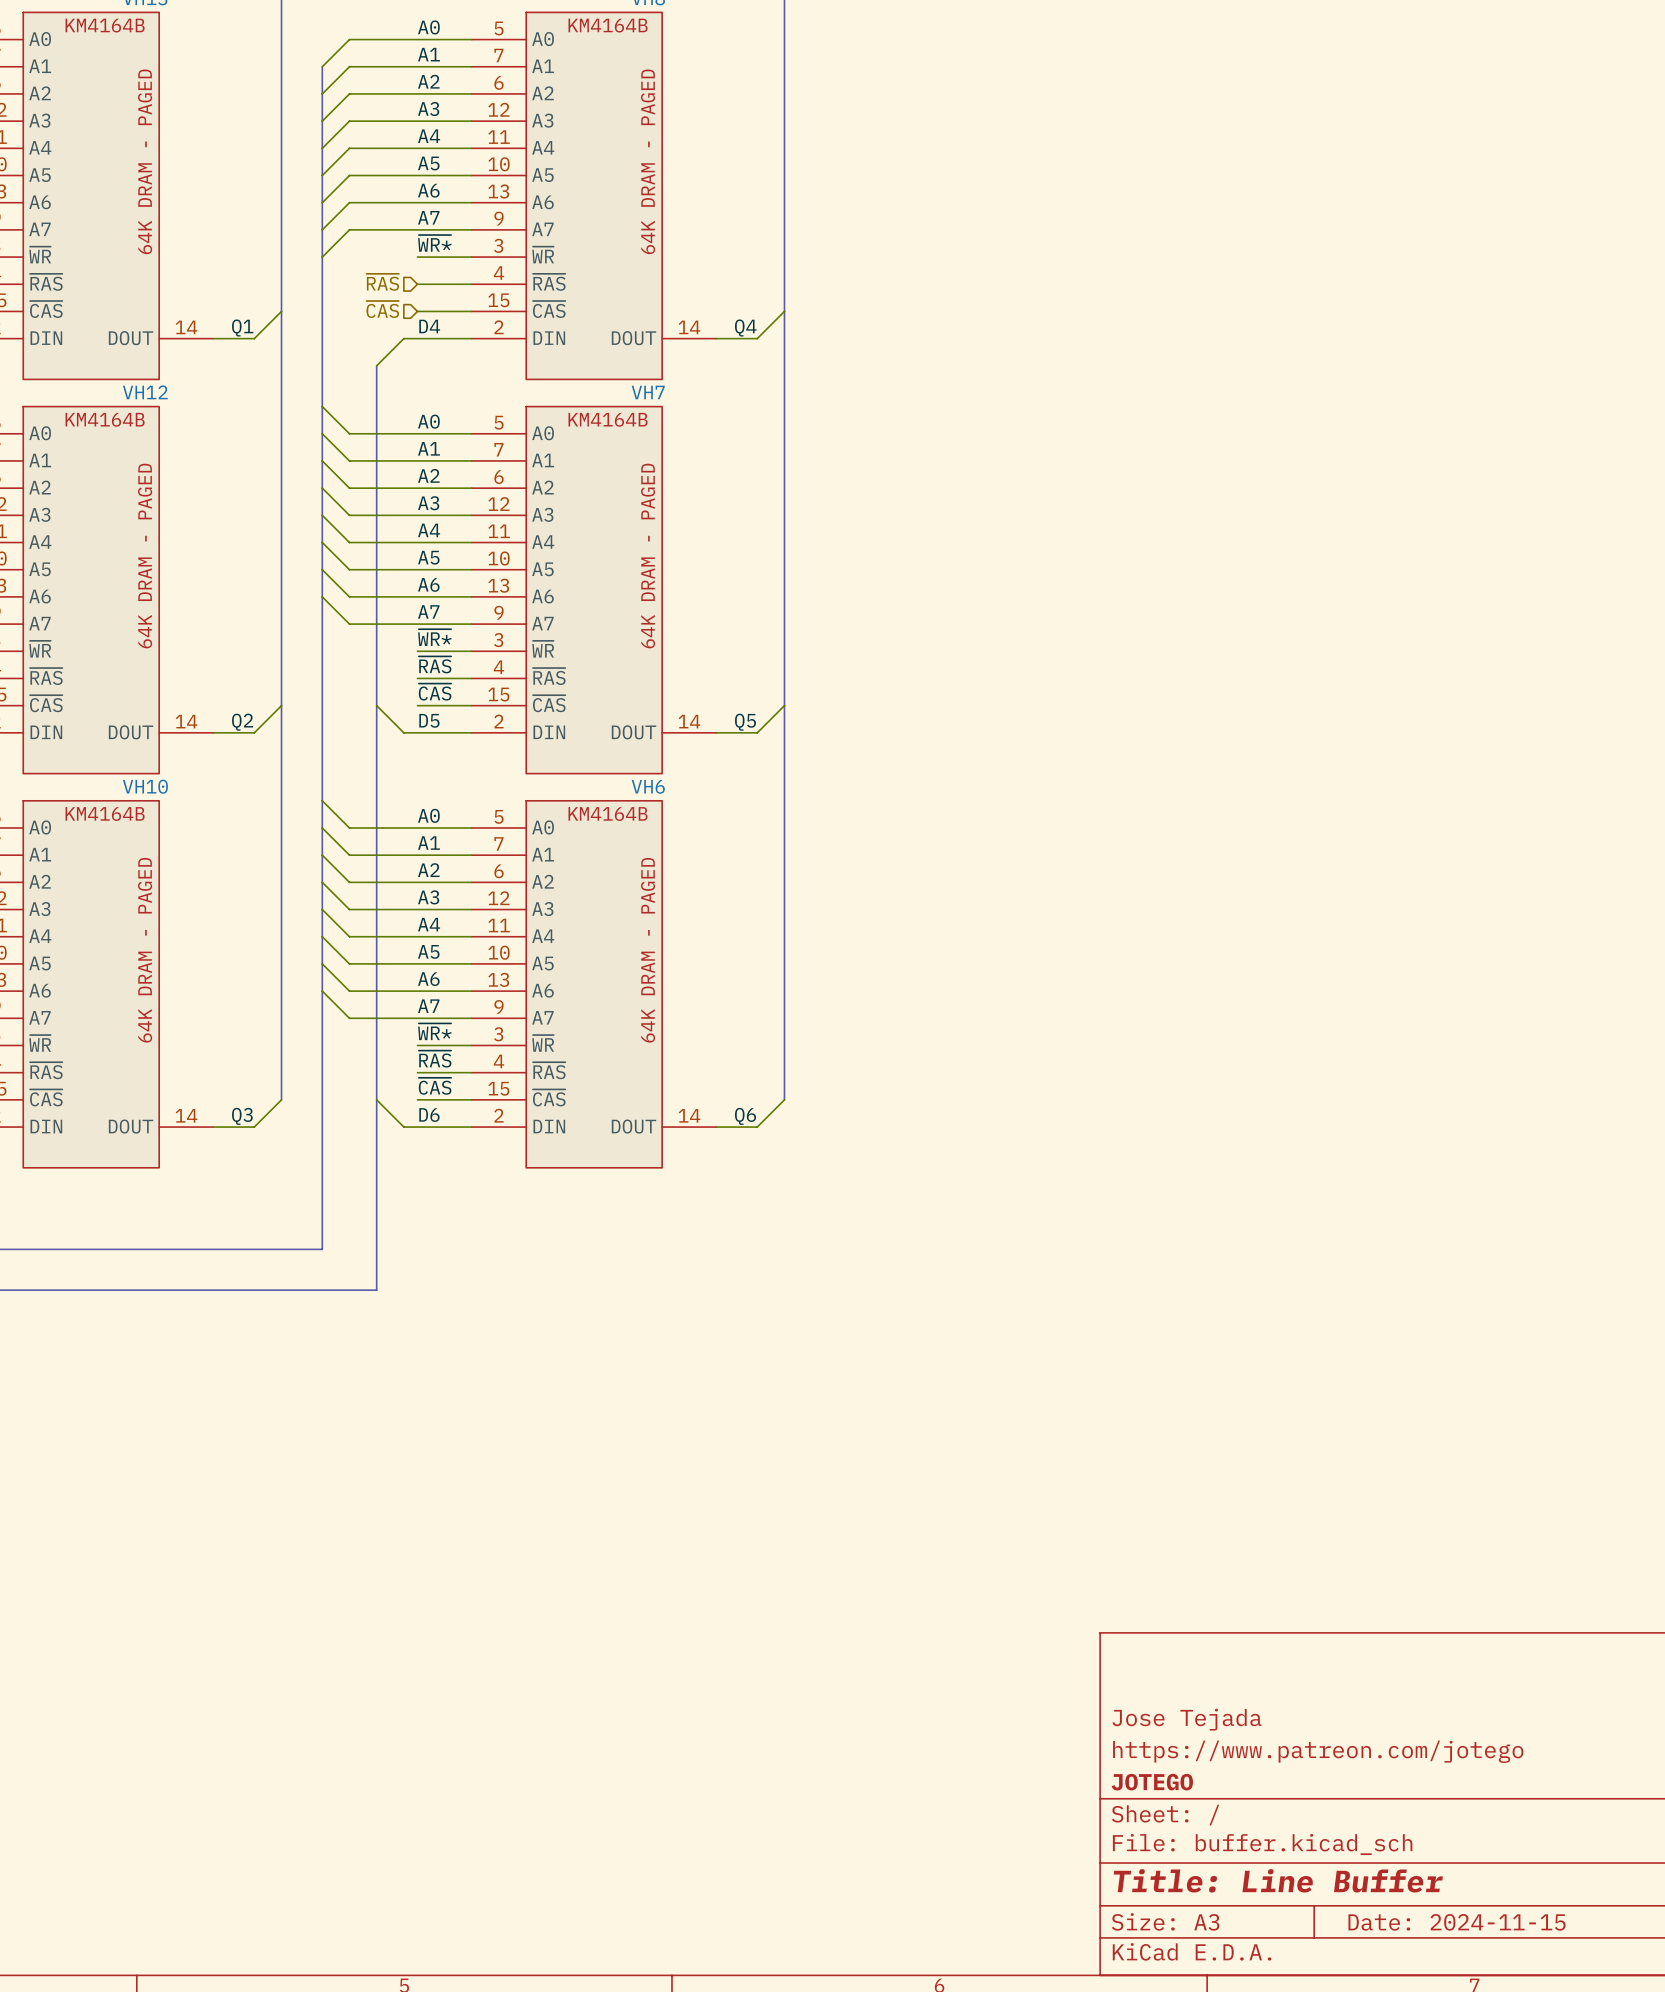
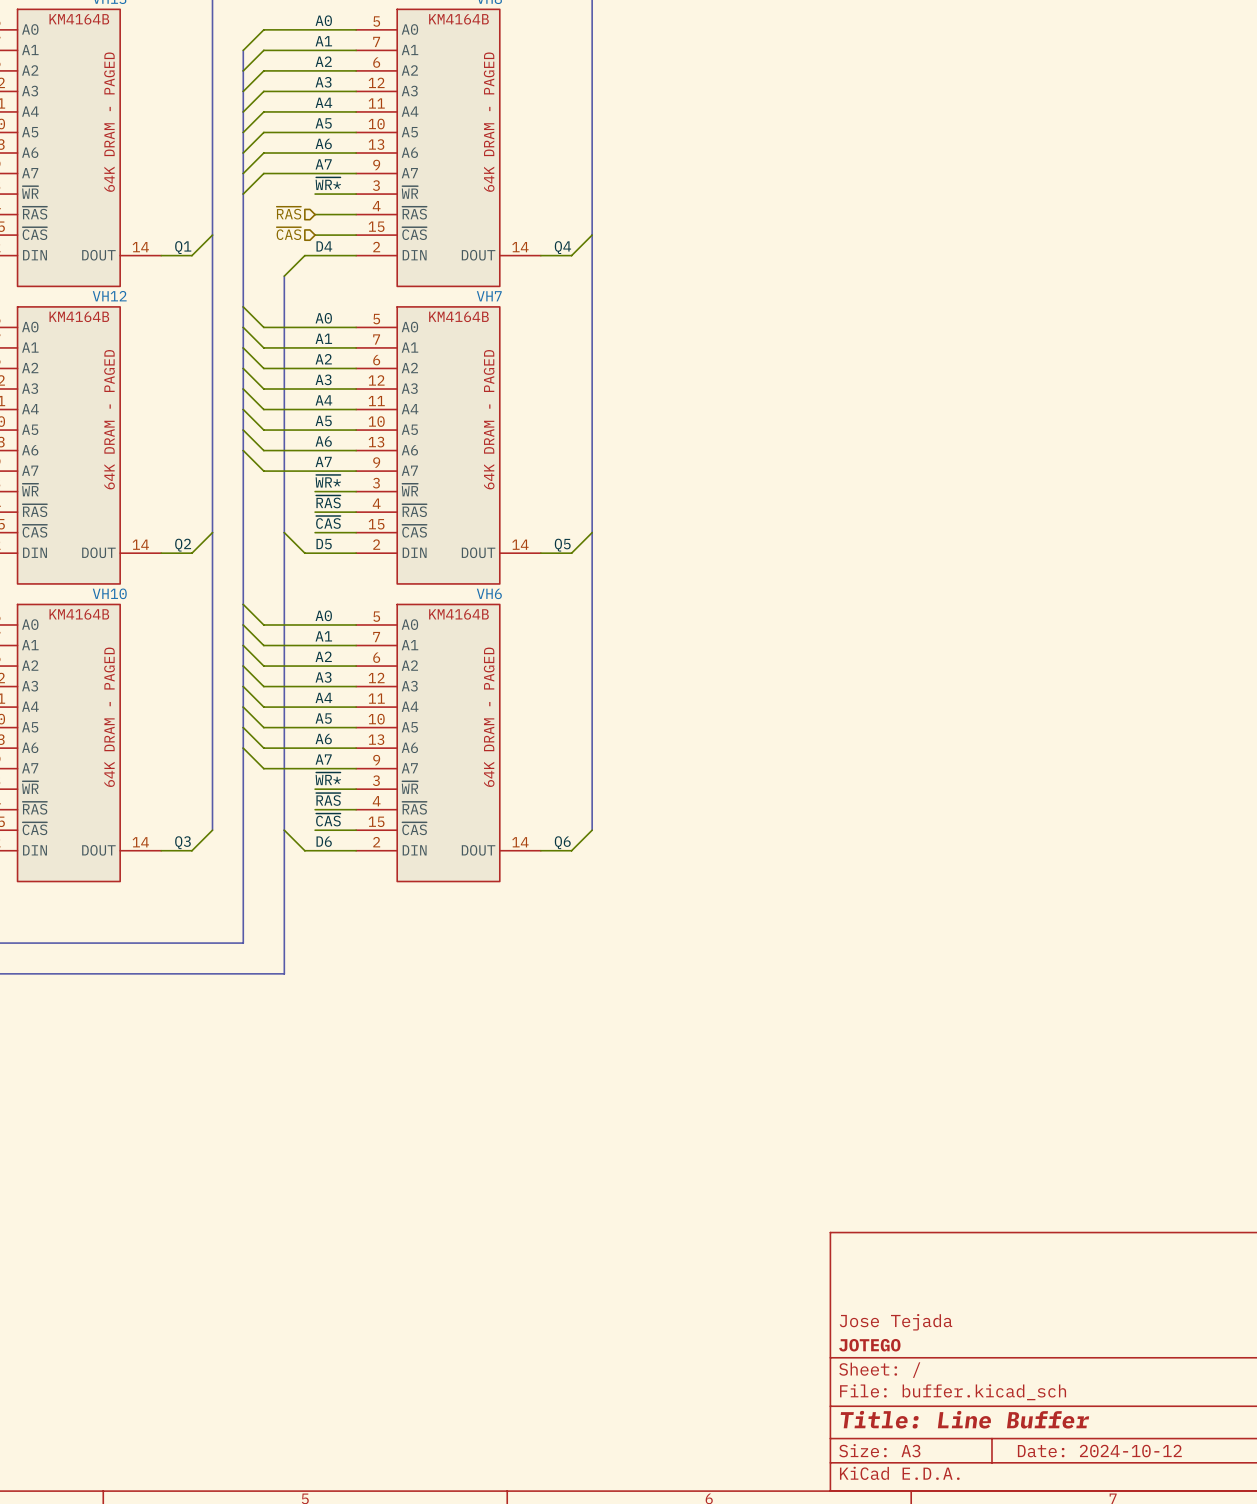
title block: Jose Tejada (1187, 1719) -> none
title block: https://www.patreon.com/jotego (1318, 1751) -> Jose Tejada (895, 1322)
title block: Date: 2024-11-15 (1457, 1922) -> Date: 2024-10-12 (1099, 1451)

